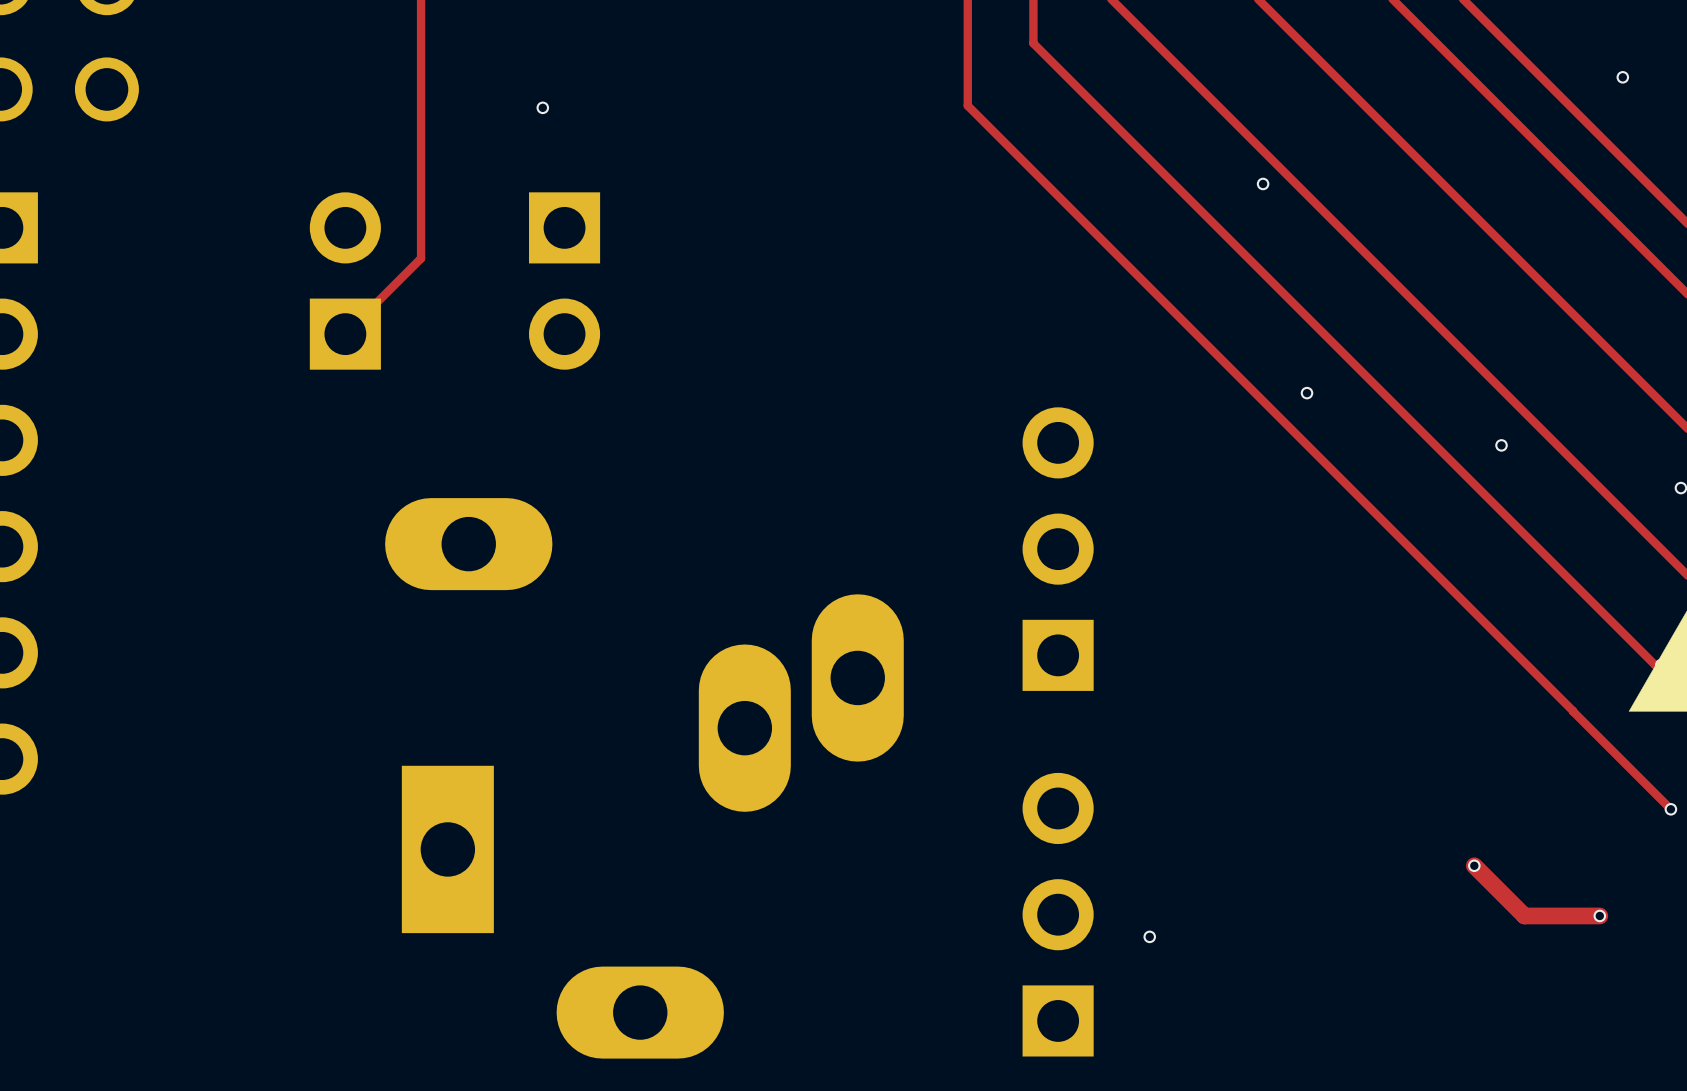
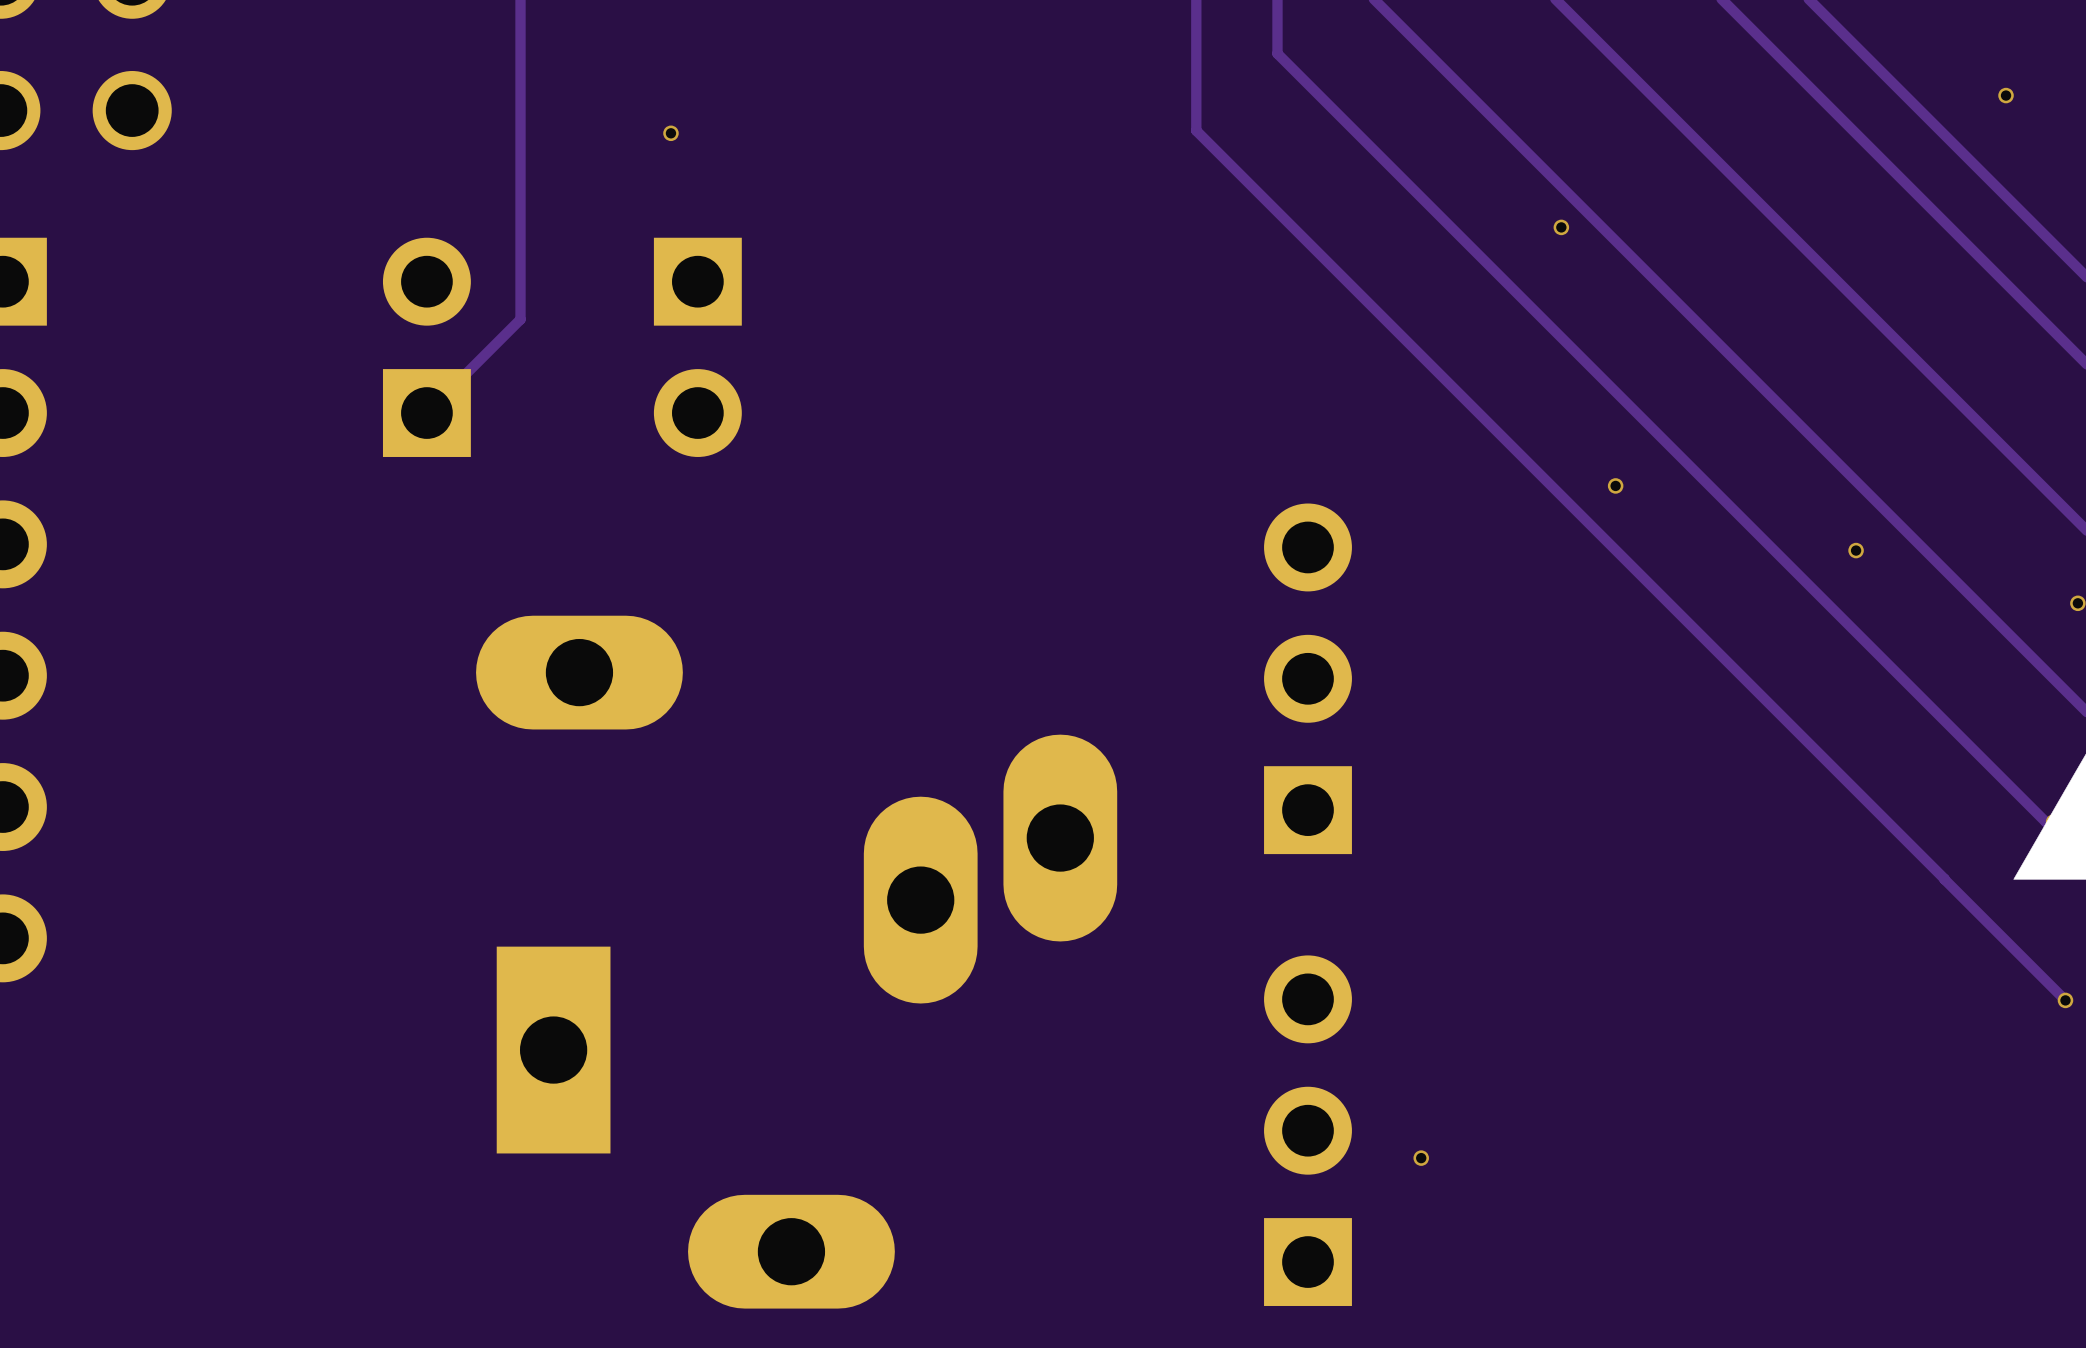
track: (1474, 865) (1524, 915) (1599, 915) -> none
via: (1474, 865) -> none
via: (1599, 915) -> none

